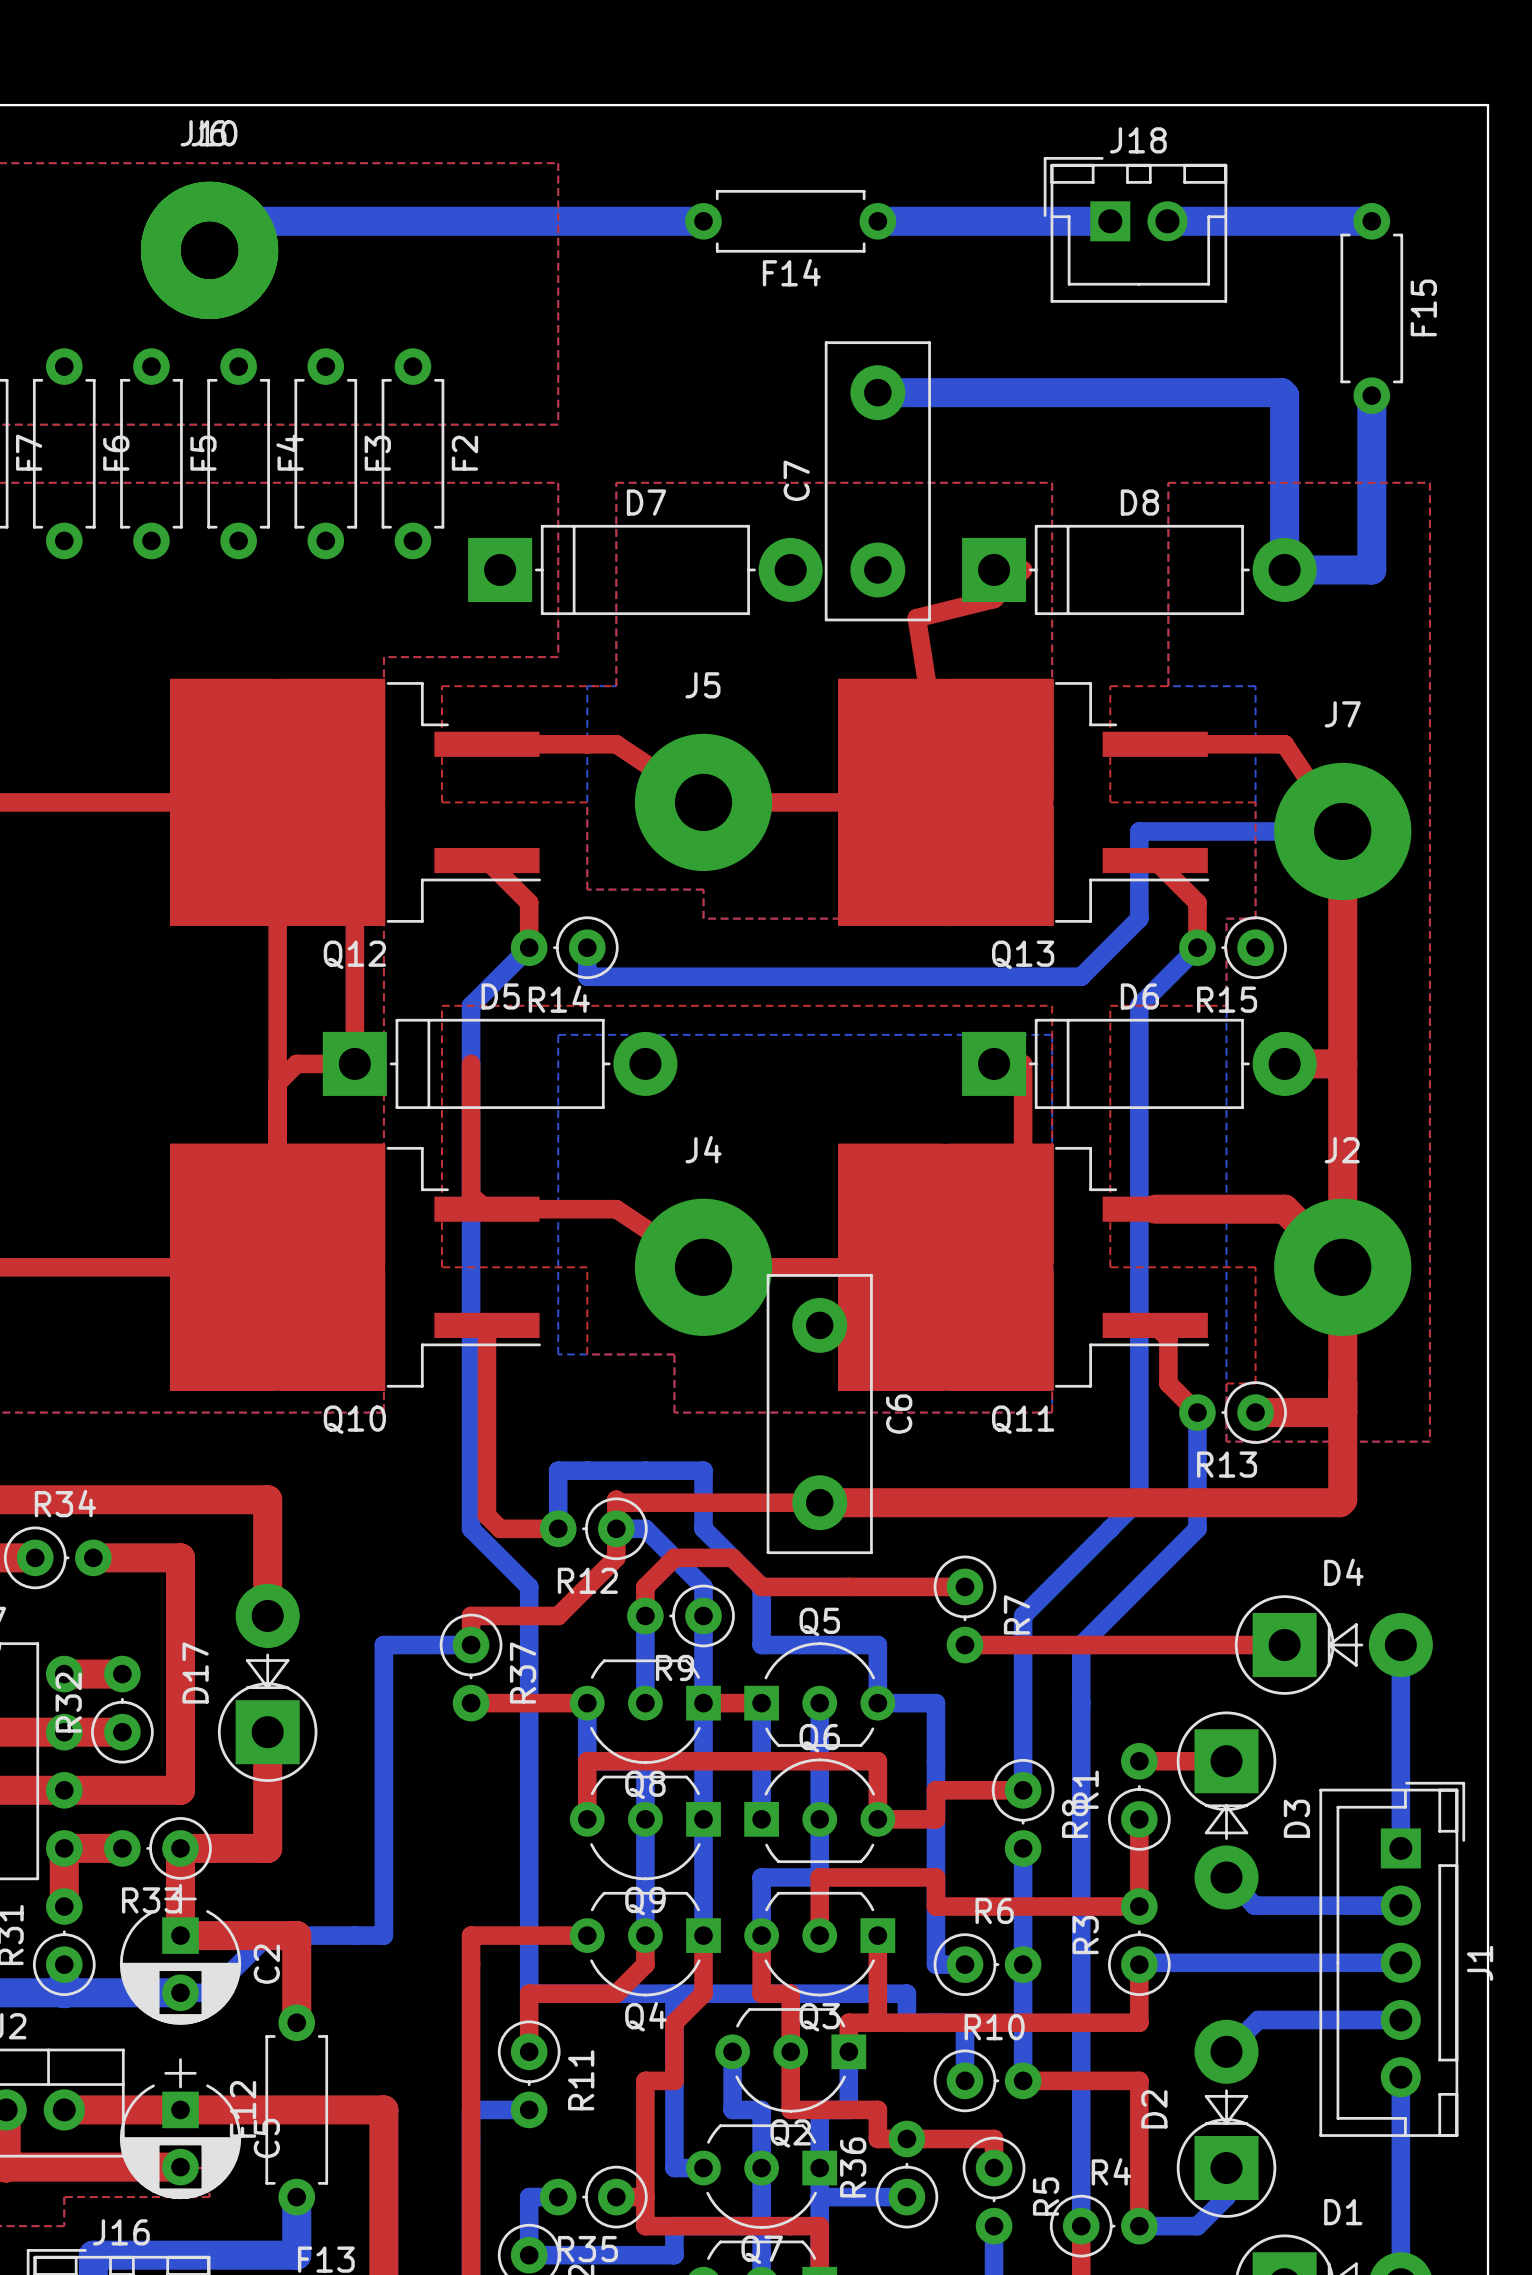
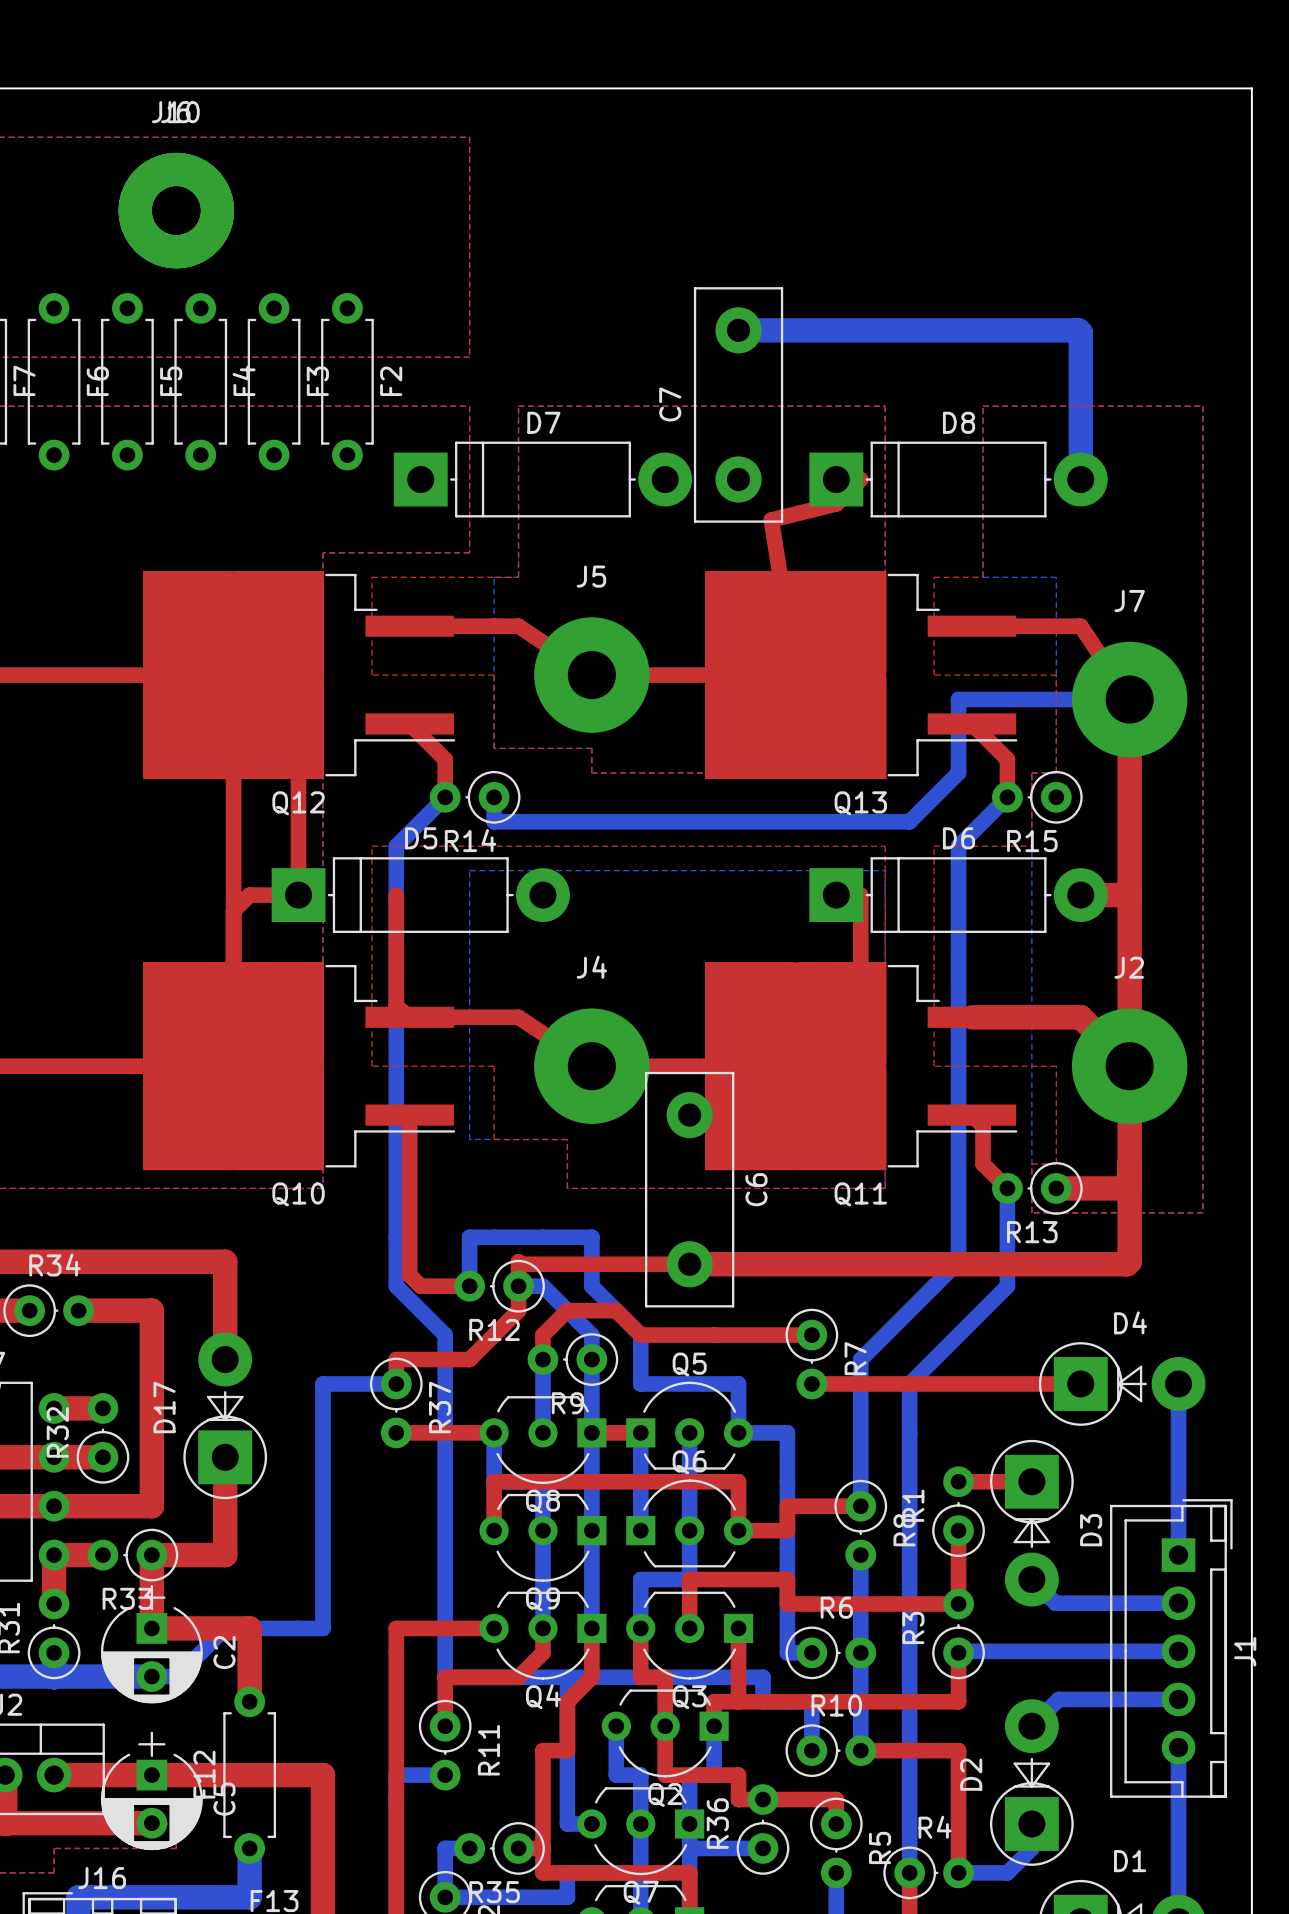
bottom track: (703, 221) (238, 221) (209, 250) -> none
F14: (790, 221) -> none
bottom track: (877, 221) (1110, 221) -> none
bottom track: (1167, 221) (1371, 221) -> none
J18: (1135, 229) -> none
F15: (1371, 308) -> none
bottom track: (1371, 395) (1371, 569) (1284, 569) -> none

